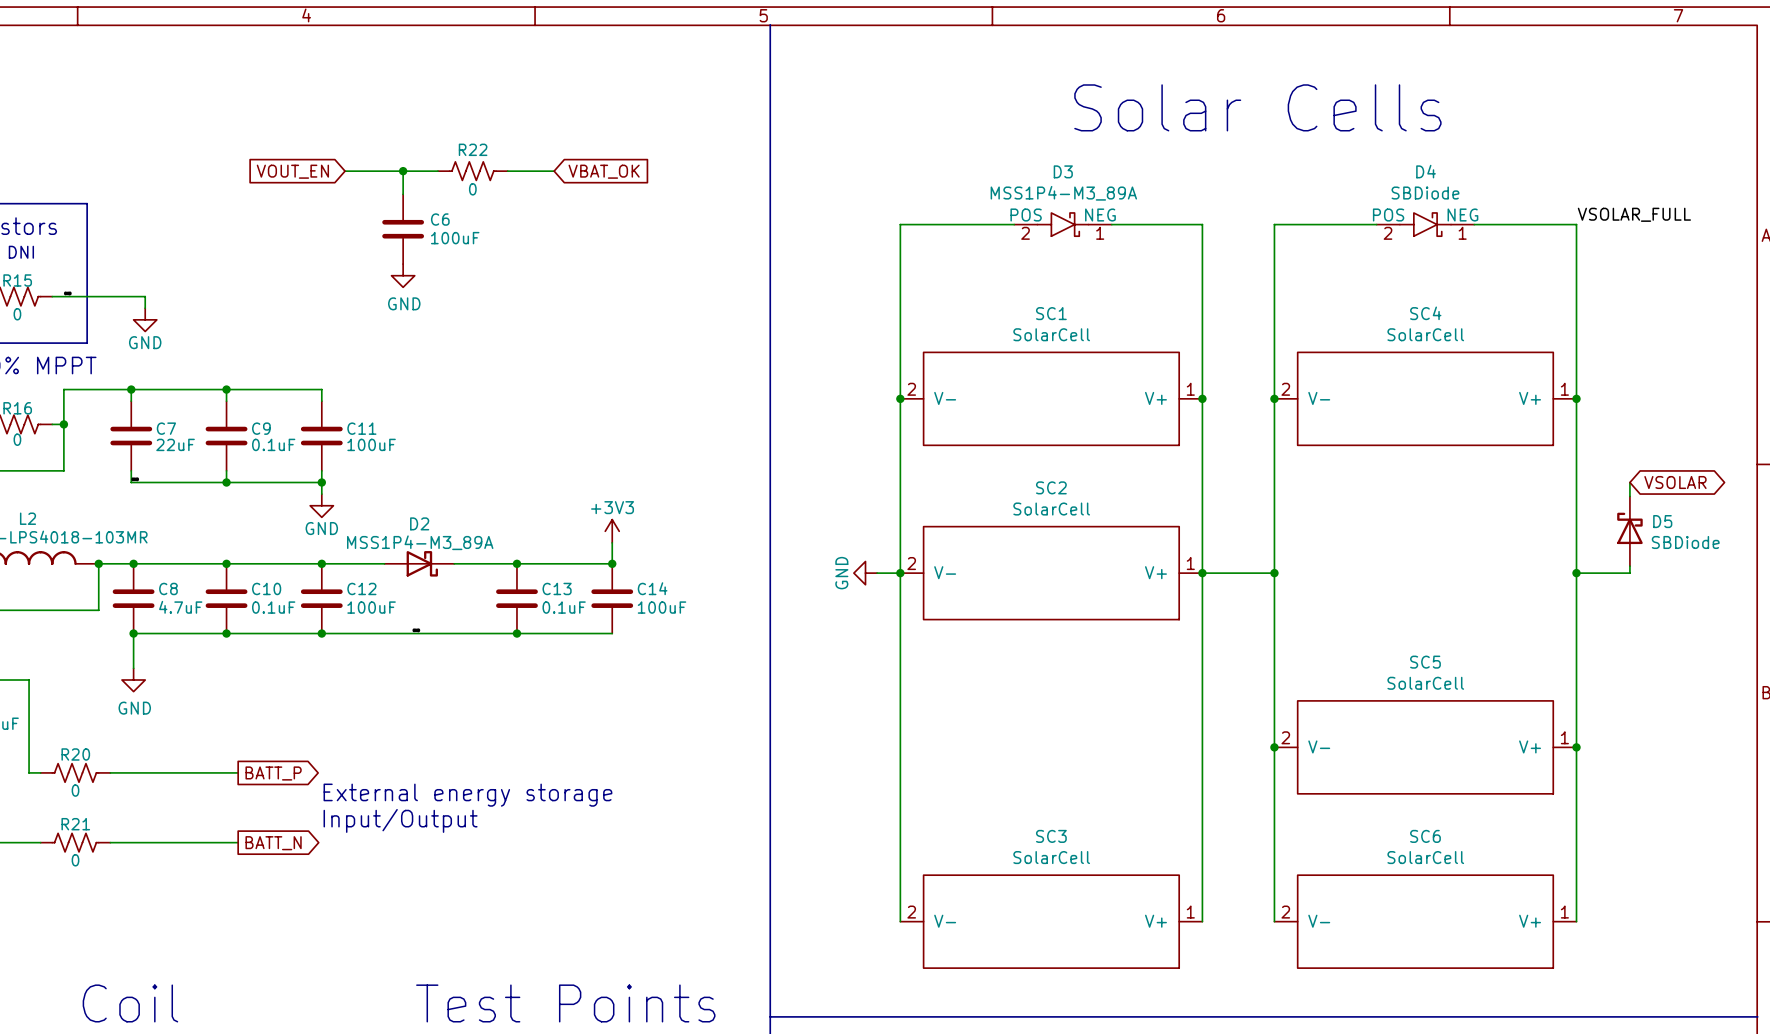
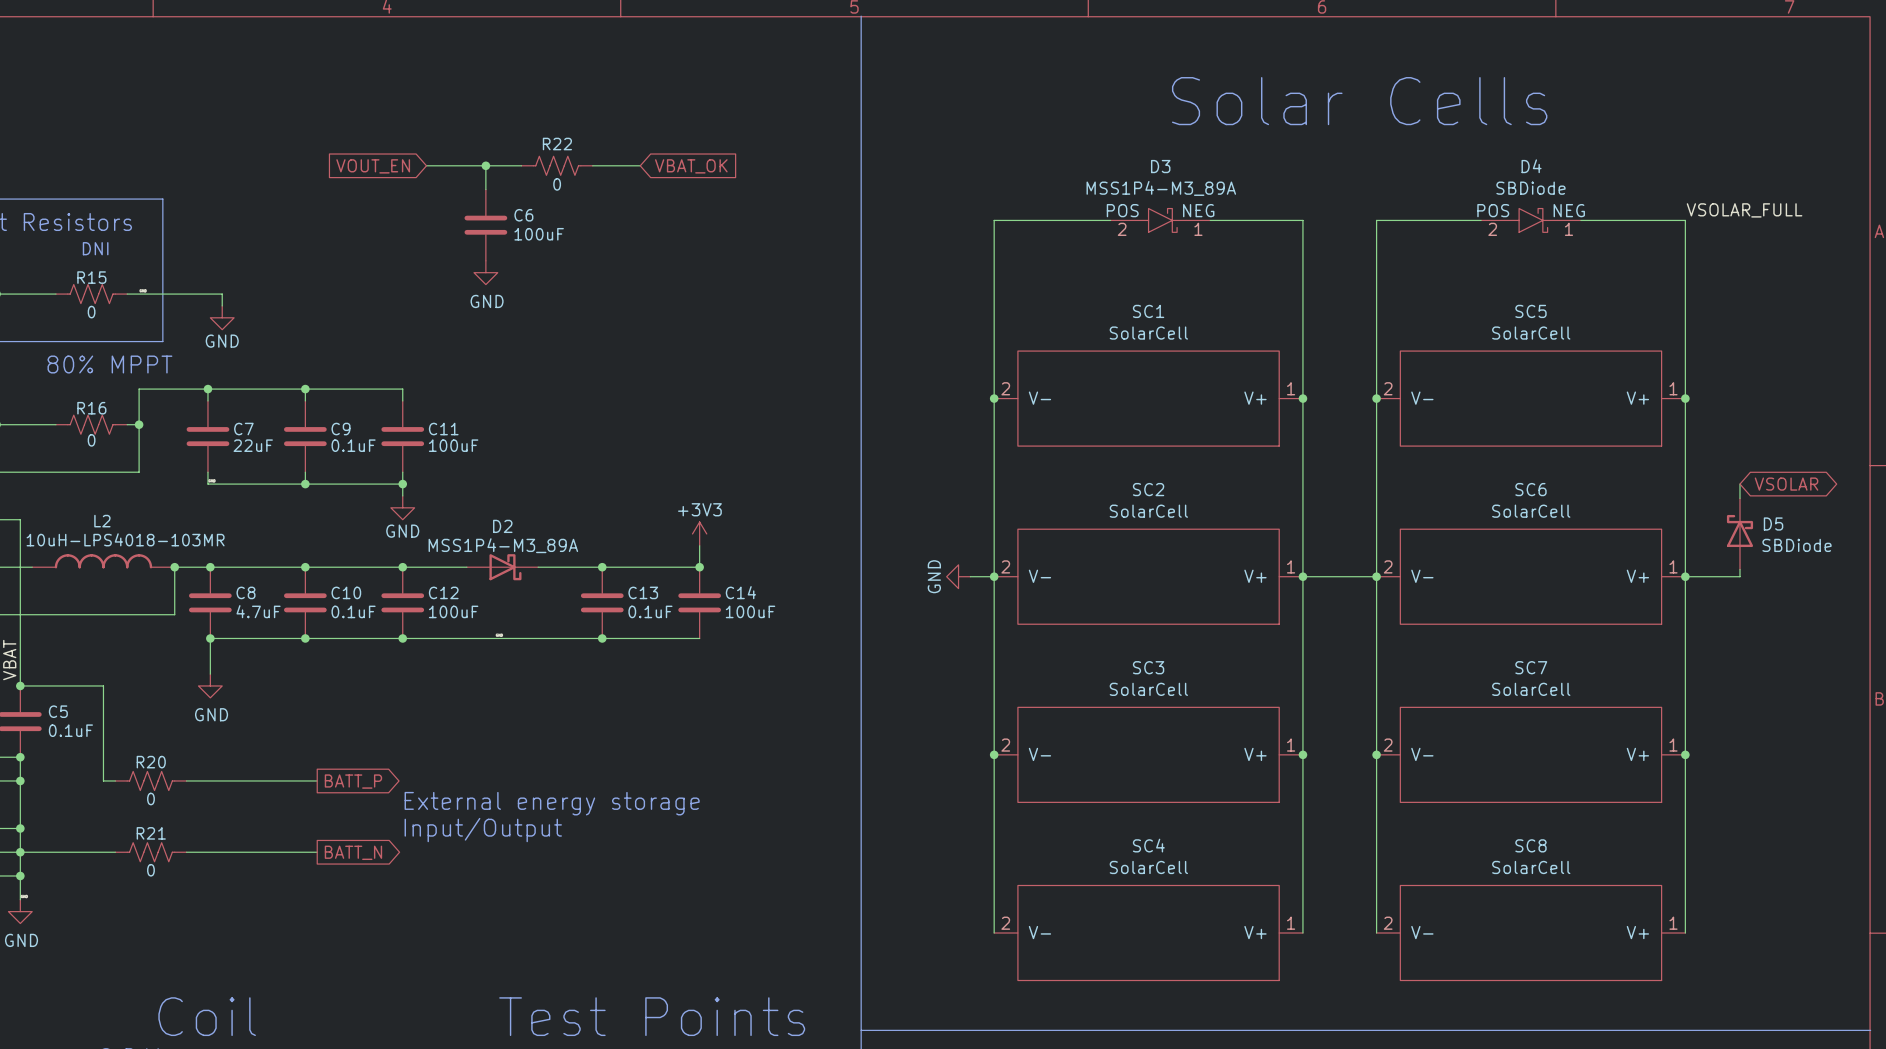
SC4 name: SC4 (1425, 313) -> SC5 (1530, 311)
SC6: none -> SolarCell (1530, 576)
SC5 name: SC5 (1425, 662) -> SC7 (1531, 667)
junction: none -> (994, 754)
SC3: none -> SolarCell (1148, 754)
junction: none -> (1302, 754)
SC3 name: SC3 (1051, 836) -> SC4 (1148, 845)
SC6 name: SC6 (1425, 836) -> SC8 (1530, 845)

